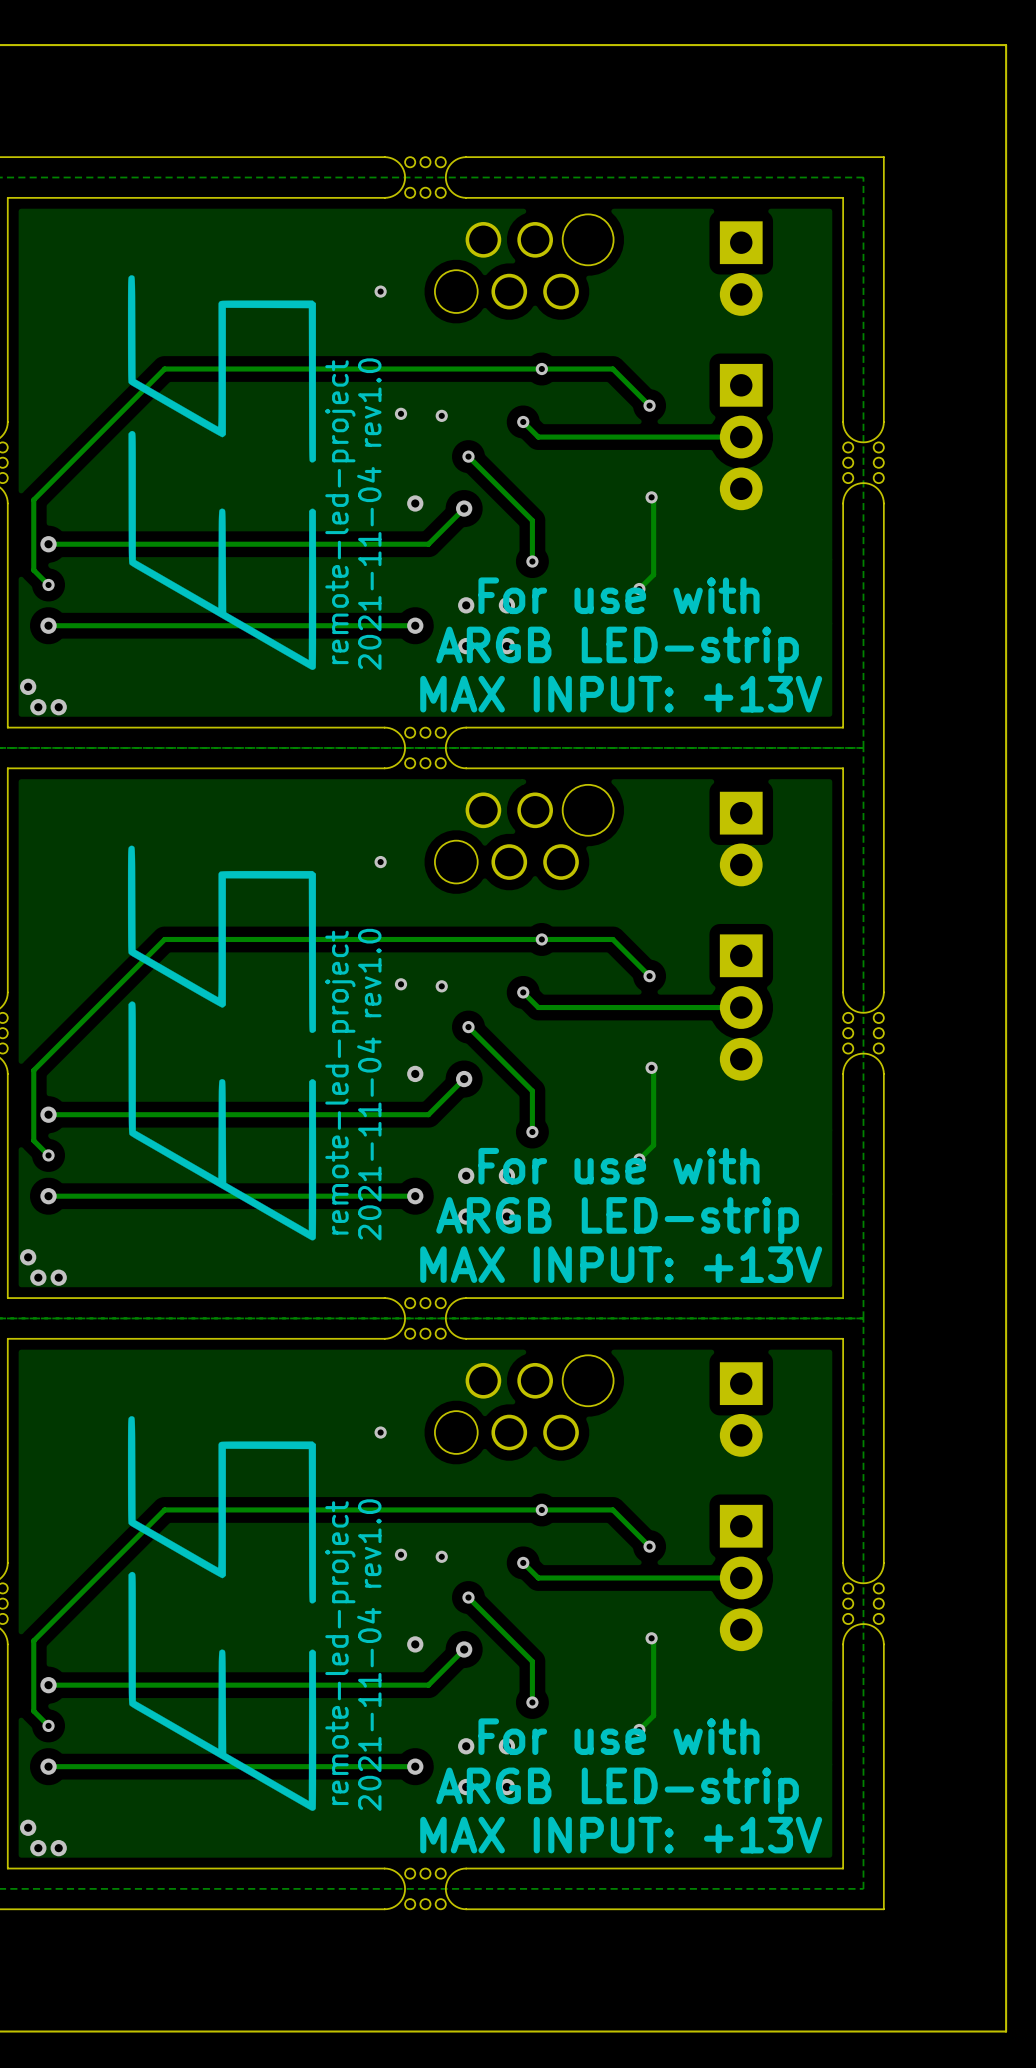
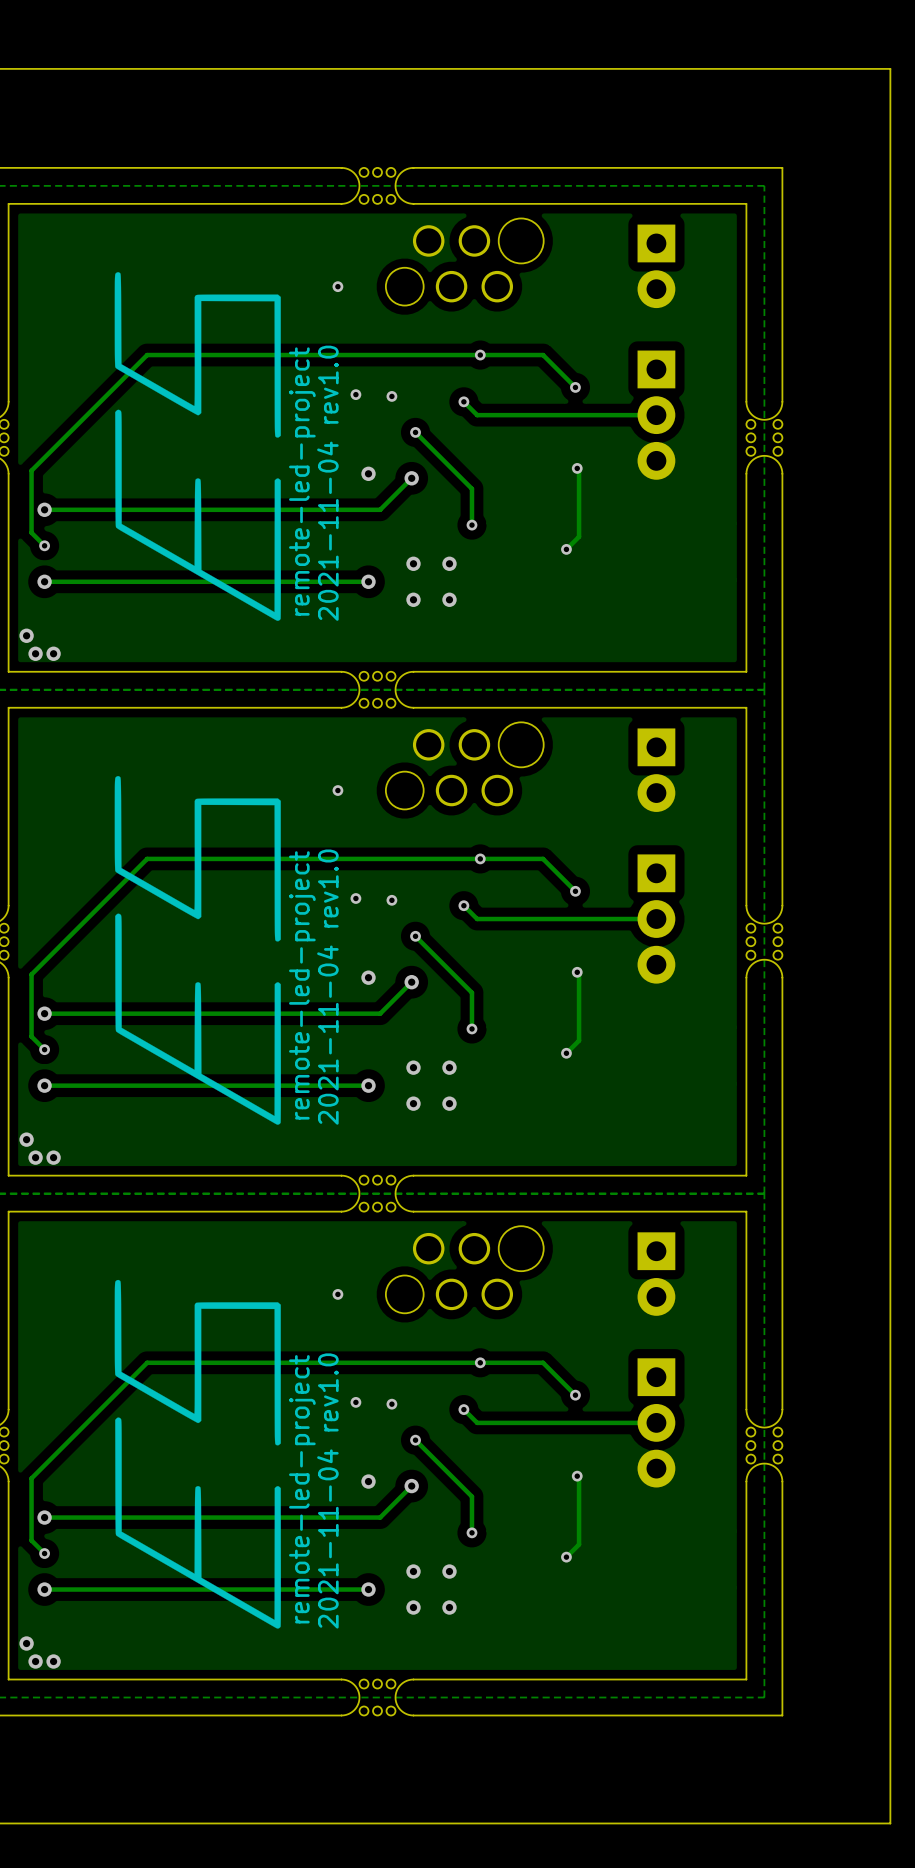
text: For use with (619, 595) -> none
text: ARGB LED-strip (617, 650) -> none
text: MAX INPUT: +13V (621, 694) -> none
text: For use with (619, 1166) -> none
text: ARGB LED-strip (617, 1220) -> none
text: MAX INPUT: +13V (621, 1264) -> none
text: For use with (619, 1736) -> none
text: ARGB LED-strip (617, 1790) -> none
text: MAX INPUT: +13V (621, 1835) -> none

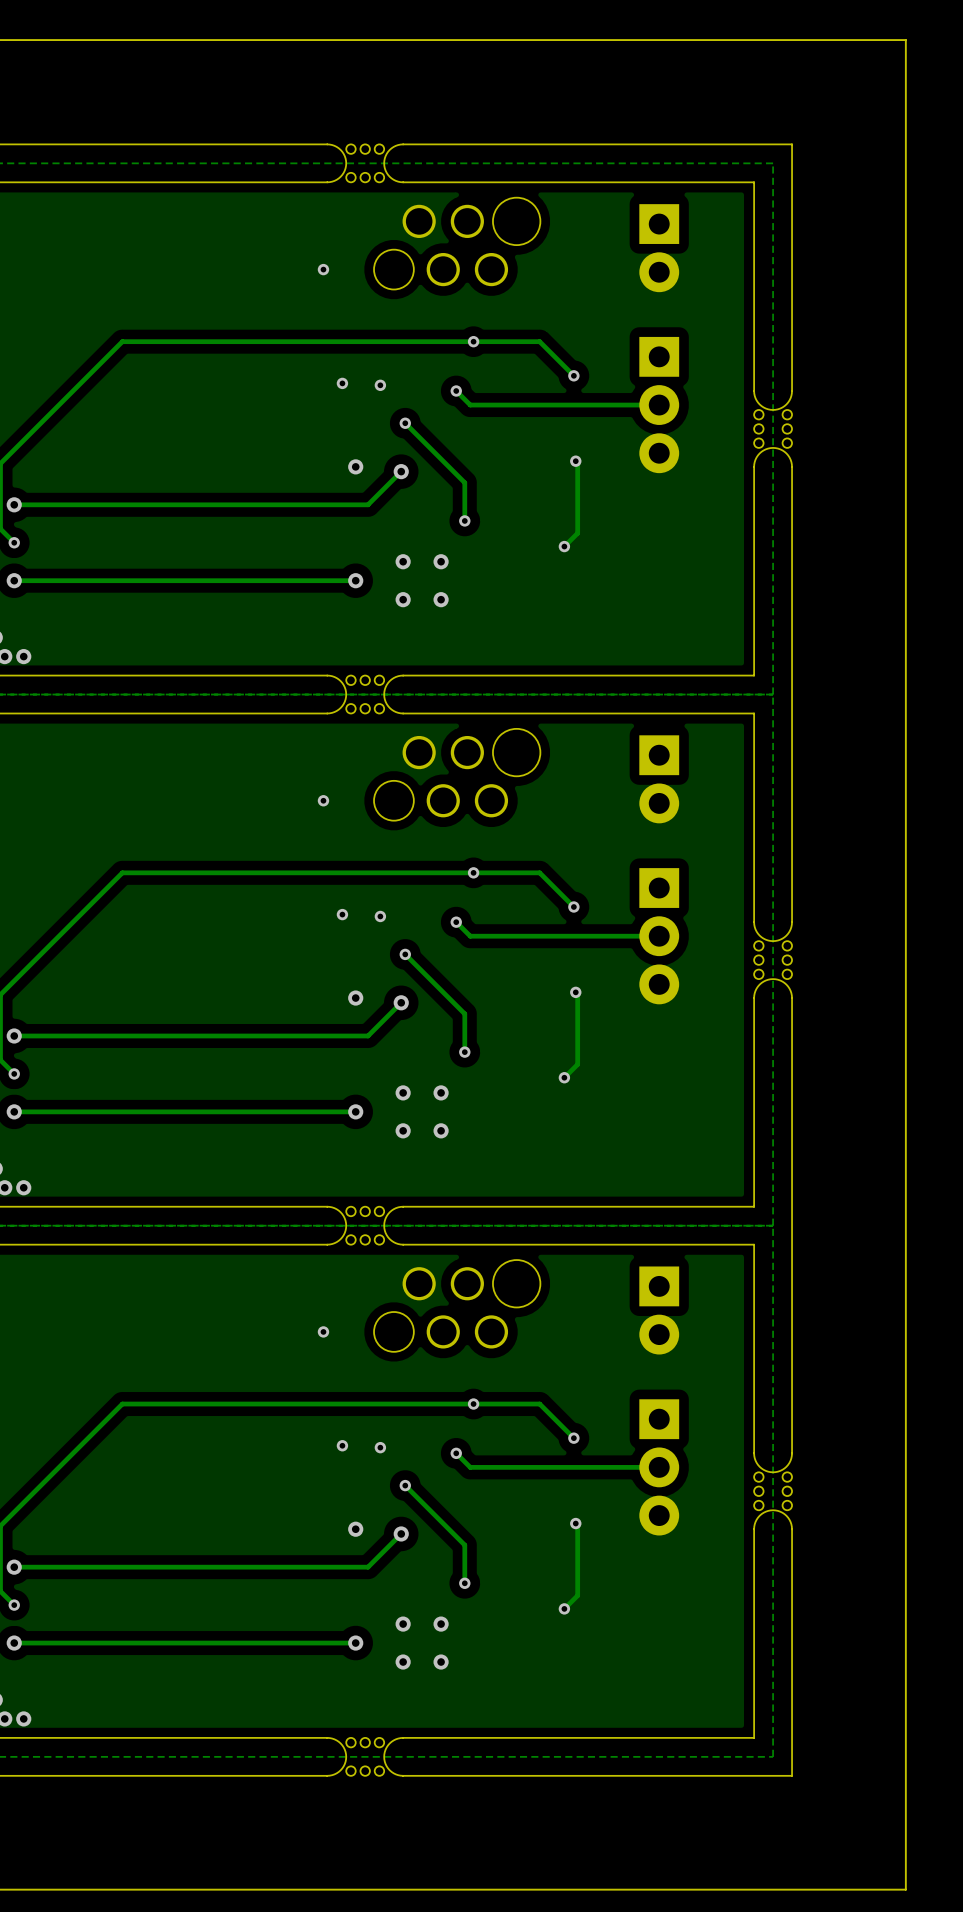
drawing: [114, 272, 281, 621] -> none
text: remote-led-project (302, 481) -> none
text: 2021-11-04 rev1.0 (327, 483) -> none
drawing: [114, 776, 281, 1125] -> none
text: remote-led-project (302, 985) -> none
text: 2021-11-04 rev1.0 (327, 987) -> none
drawing: [114, 1279, 281, 1629] -> none
text: remote-led-project (302, 1489) -> none
text: 2021-11-04 rev1.0 (327, 1490) -> none

